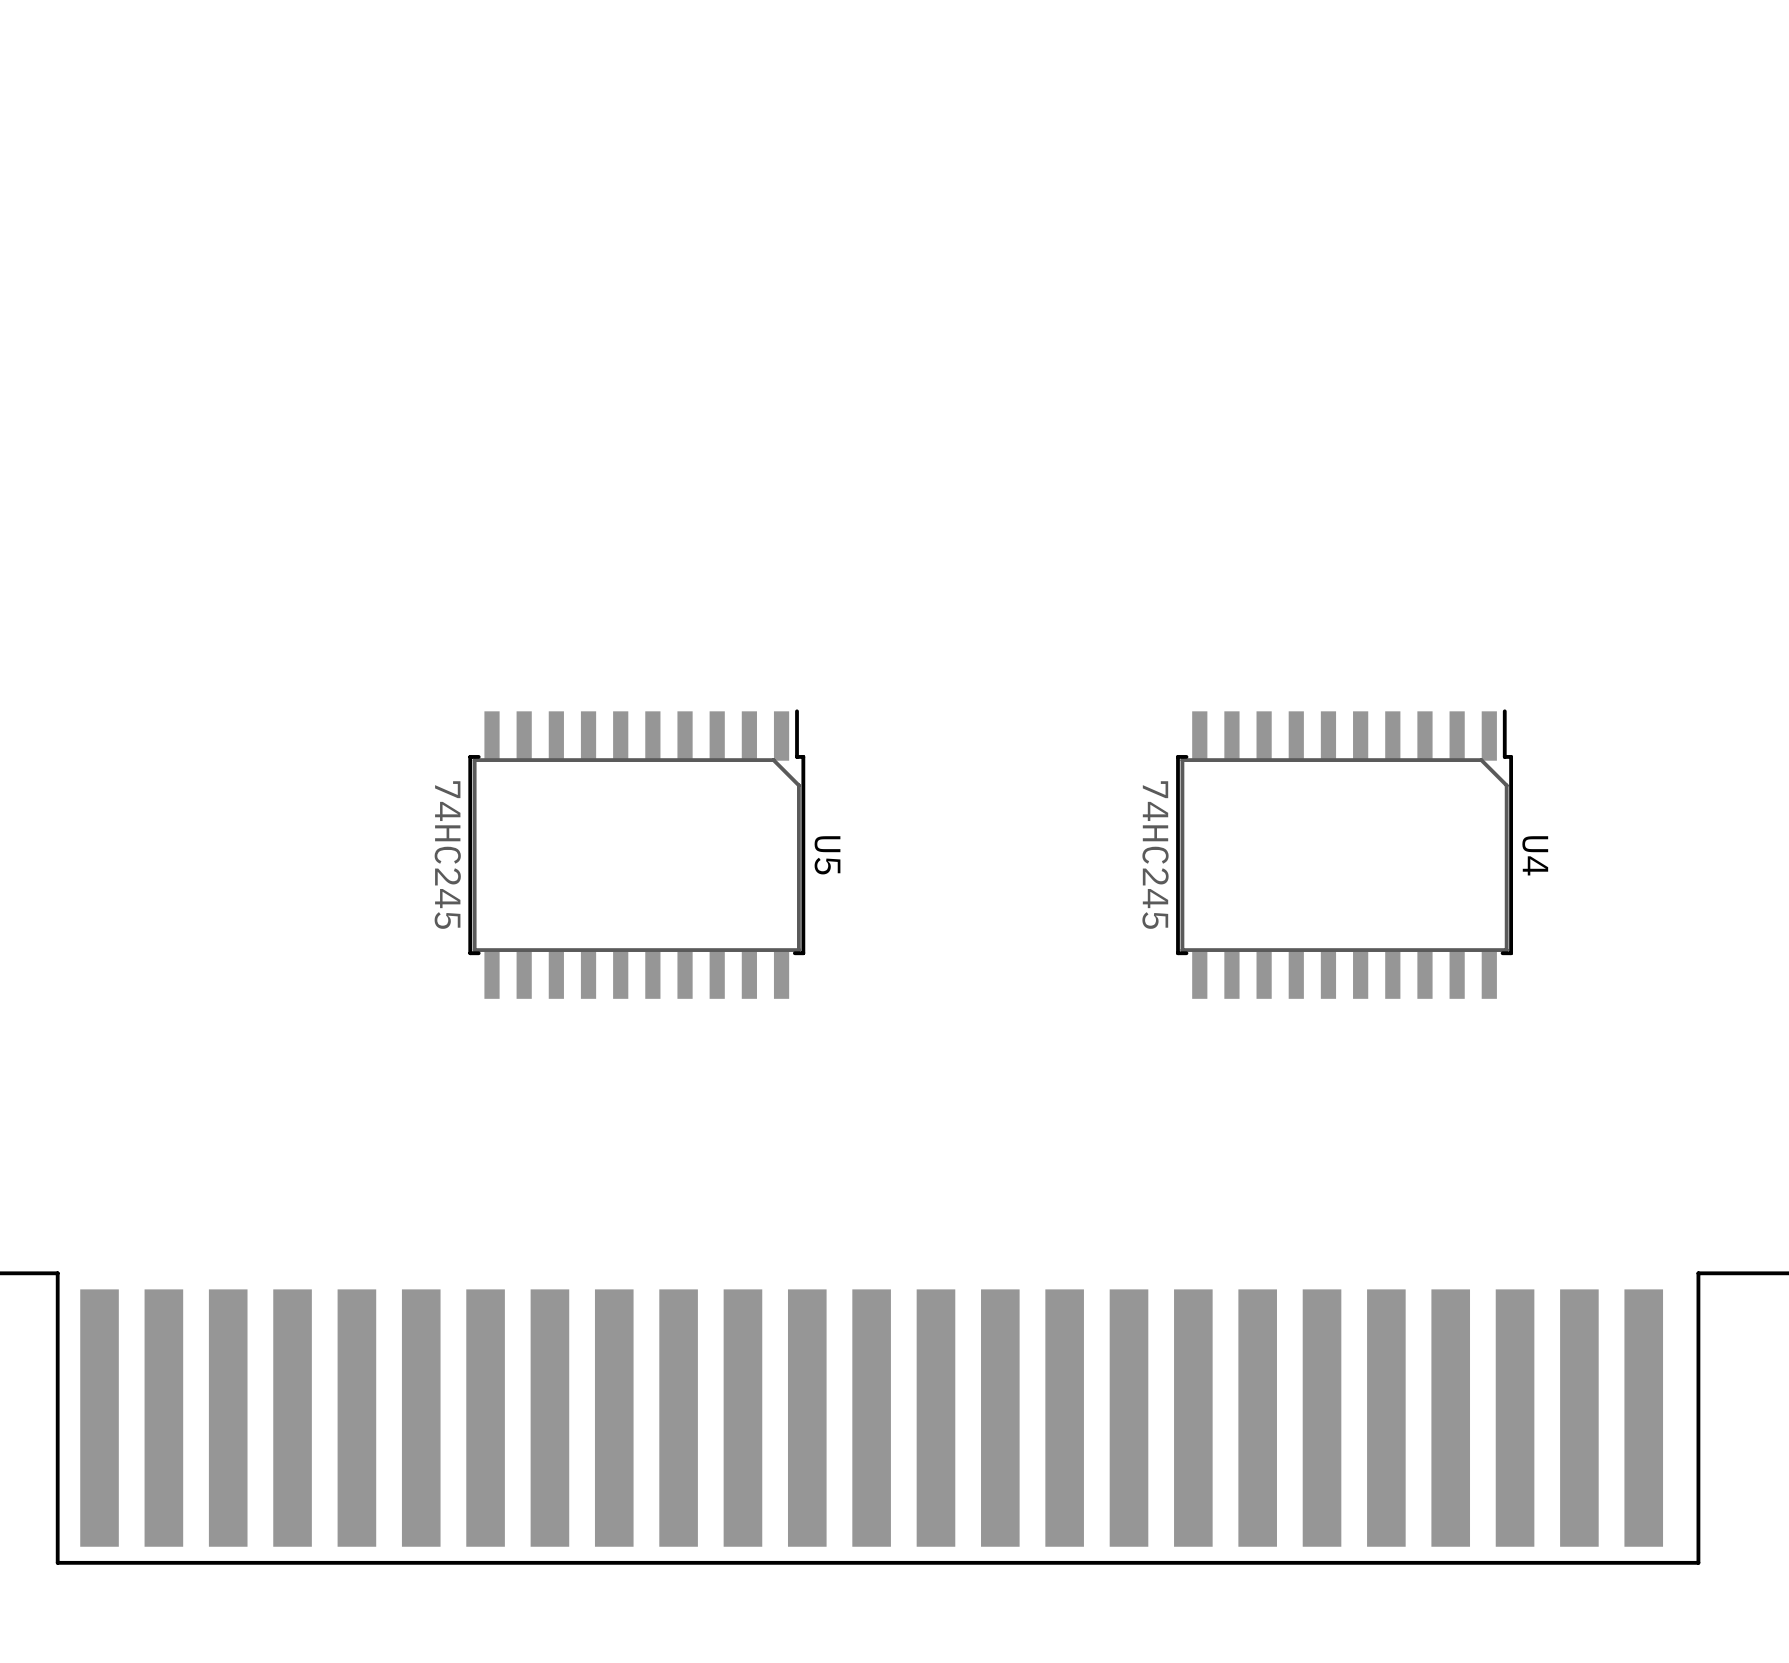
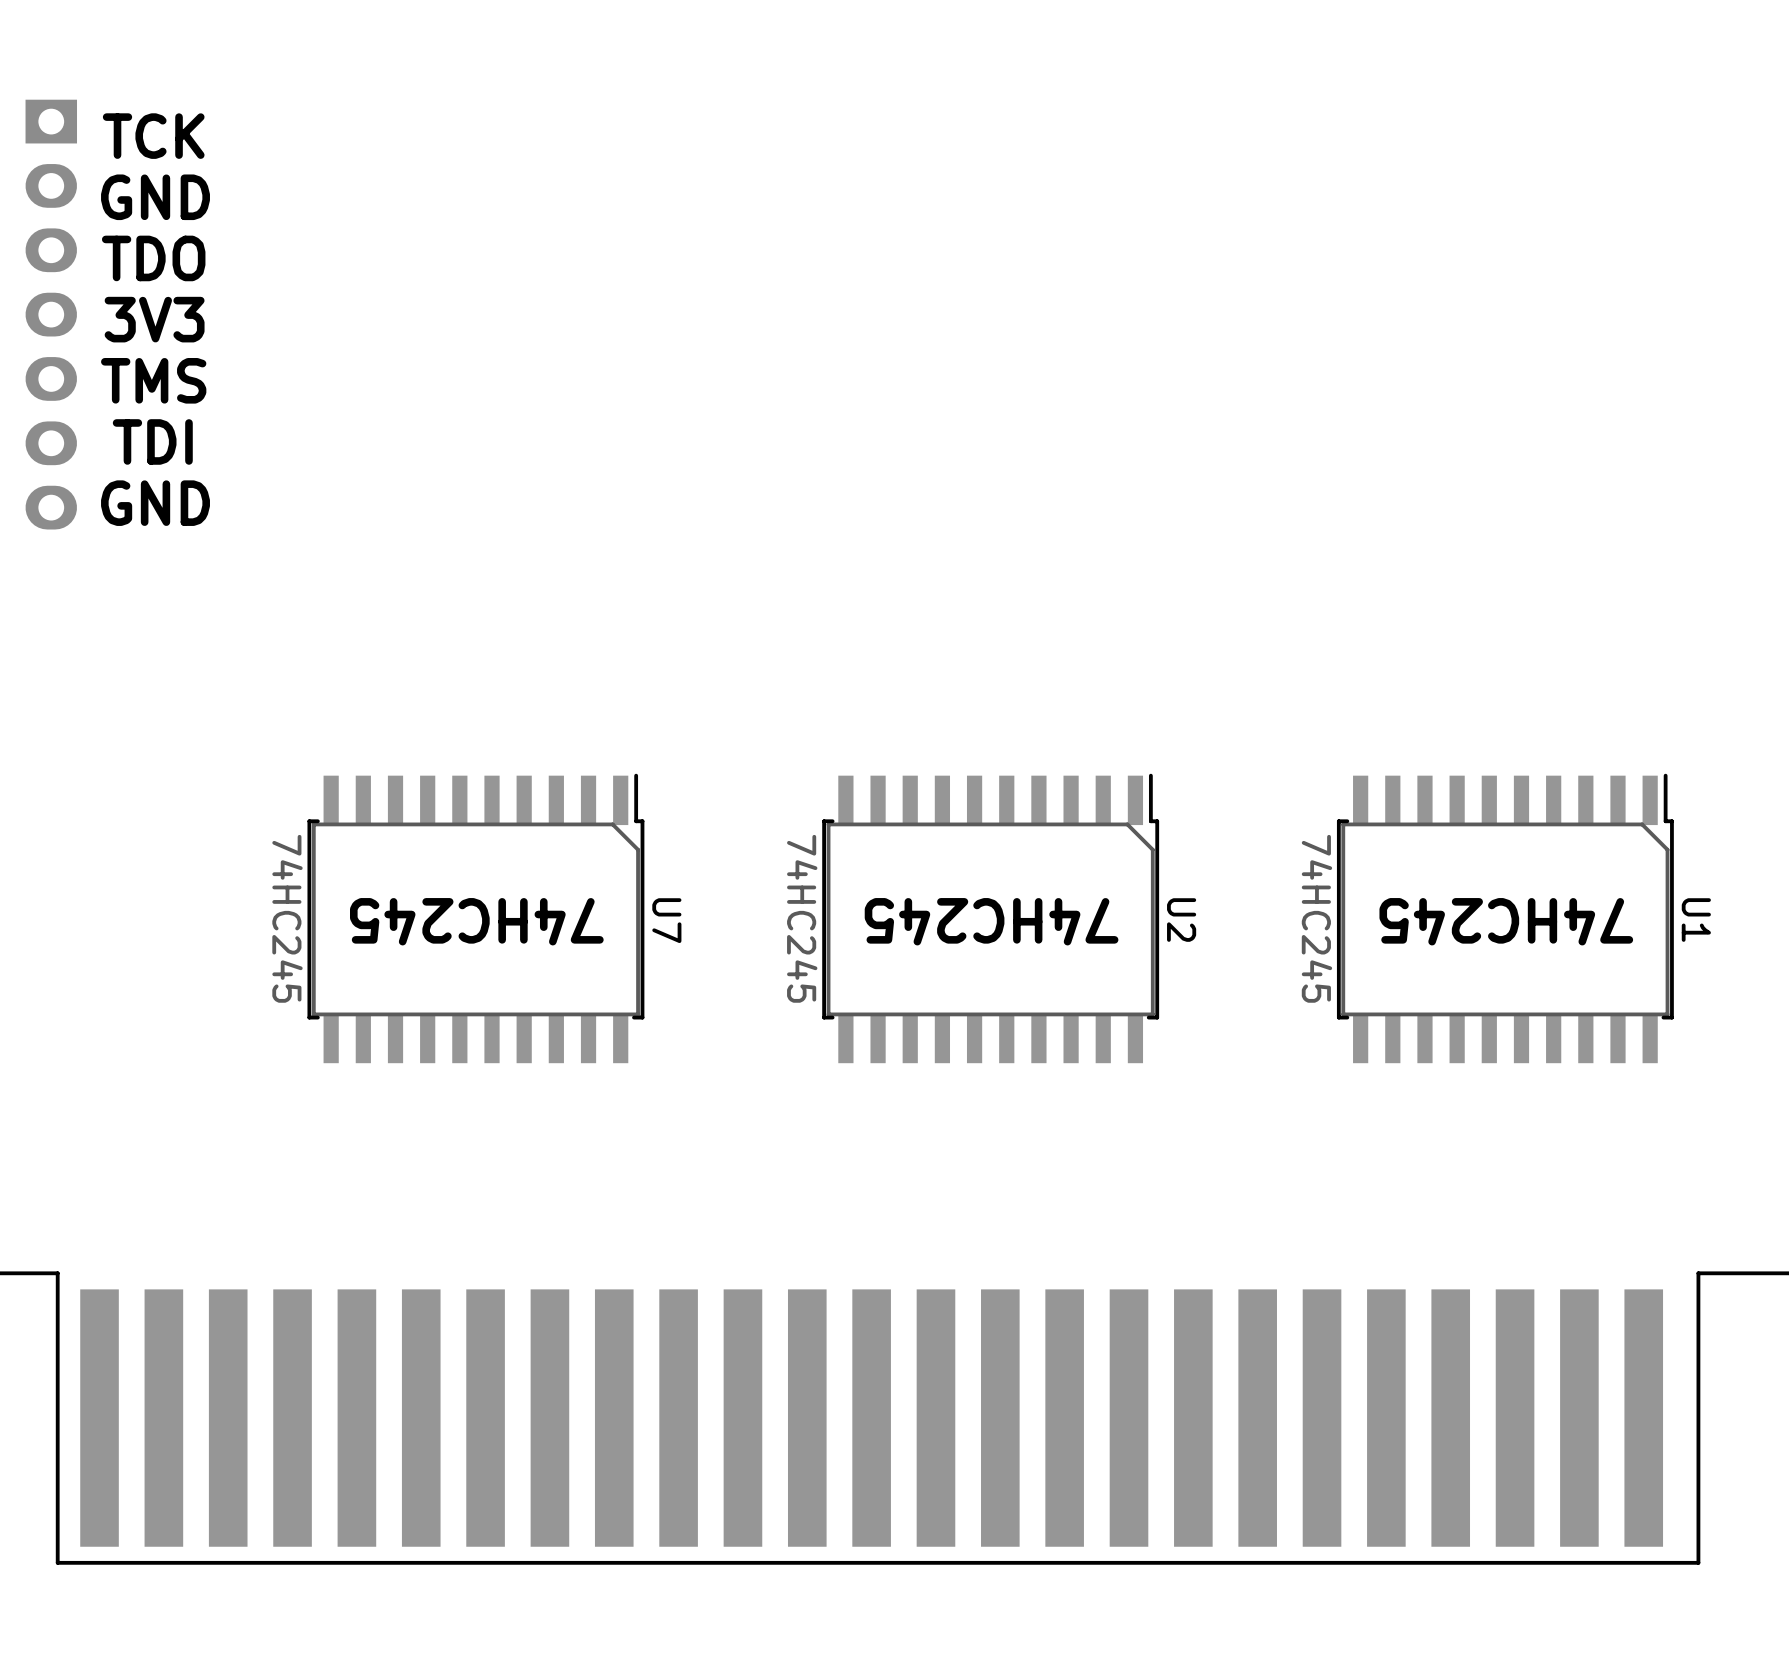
text: none -> TCK (153, 136)
text: none -> GND (155, 197)
text: none -> TDO (153, 258)
part: none -> (51, 314)
text: none -> 3V3 (154, 319)
text: none -> TMS (153, 380)
text: none -> TDI (152, 441)
text: none -> GND (155, 503)
U5: 74HC245 (636, 854) -> none
U4: 74HC245 (1344, 854) -> none
U7: none -> 74HC245 (475, 918)
U2: none -> 74HC245 (990, 918)
U1: none -> 74HC245 (1505, 918)
text: none -> 74HC245 (476, 921)
text: none -> 74HC245 (991, 921)
text: none -> 74HC245 (1506, 921)

